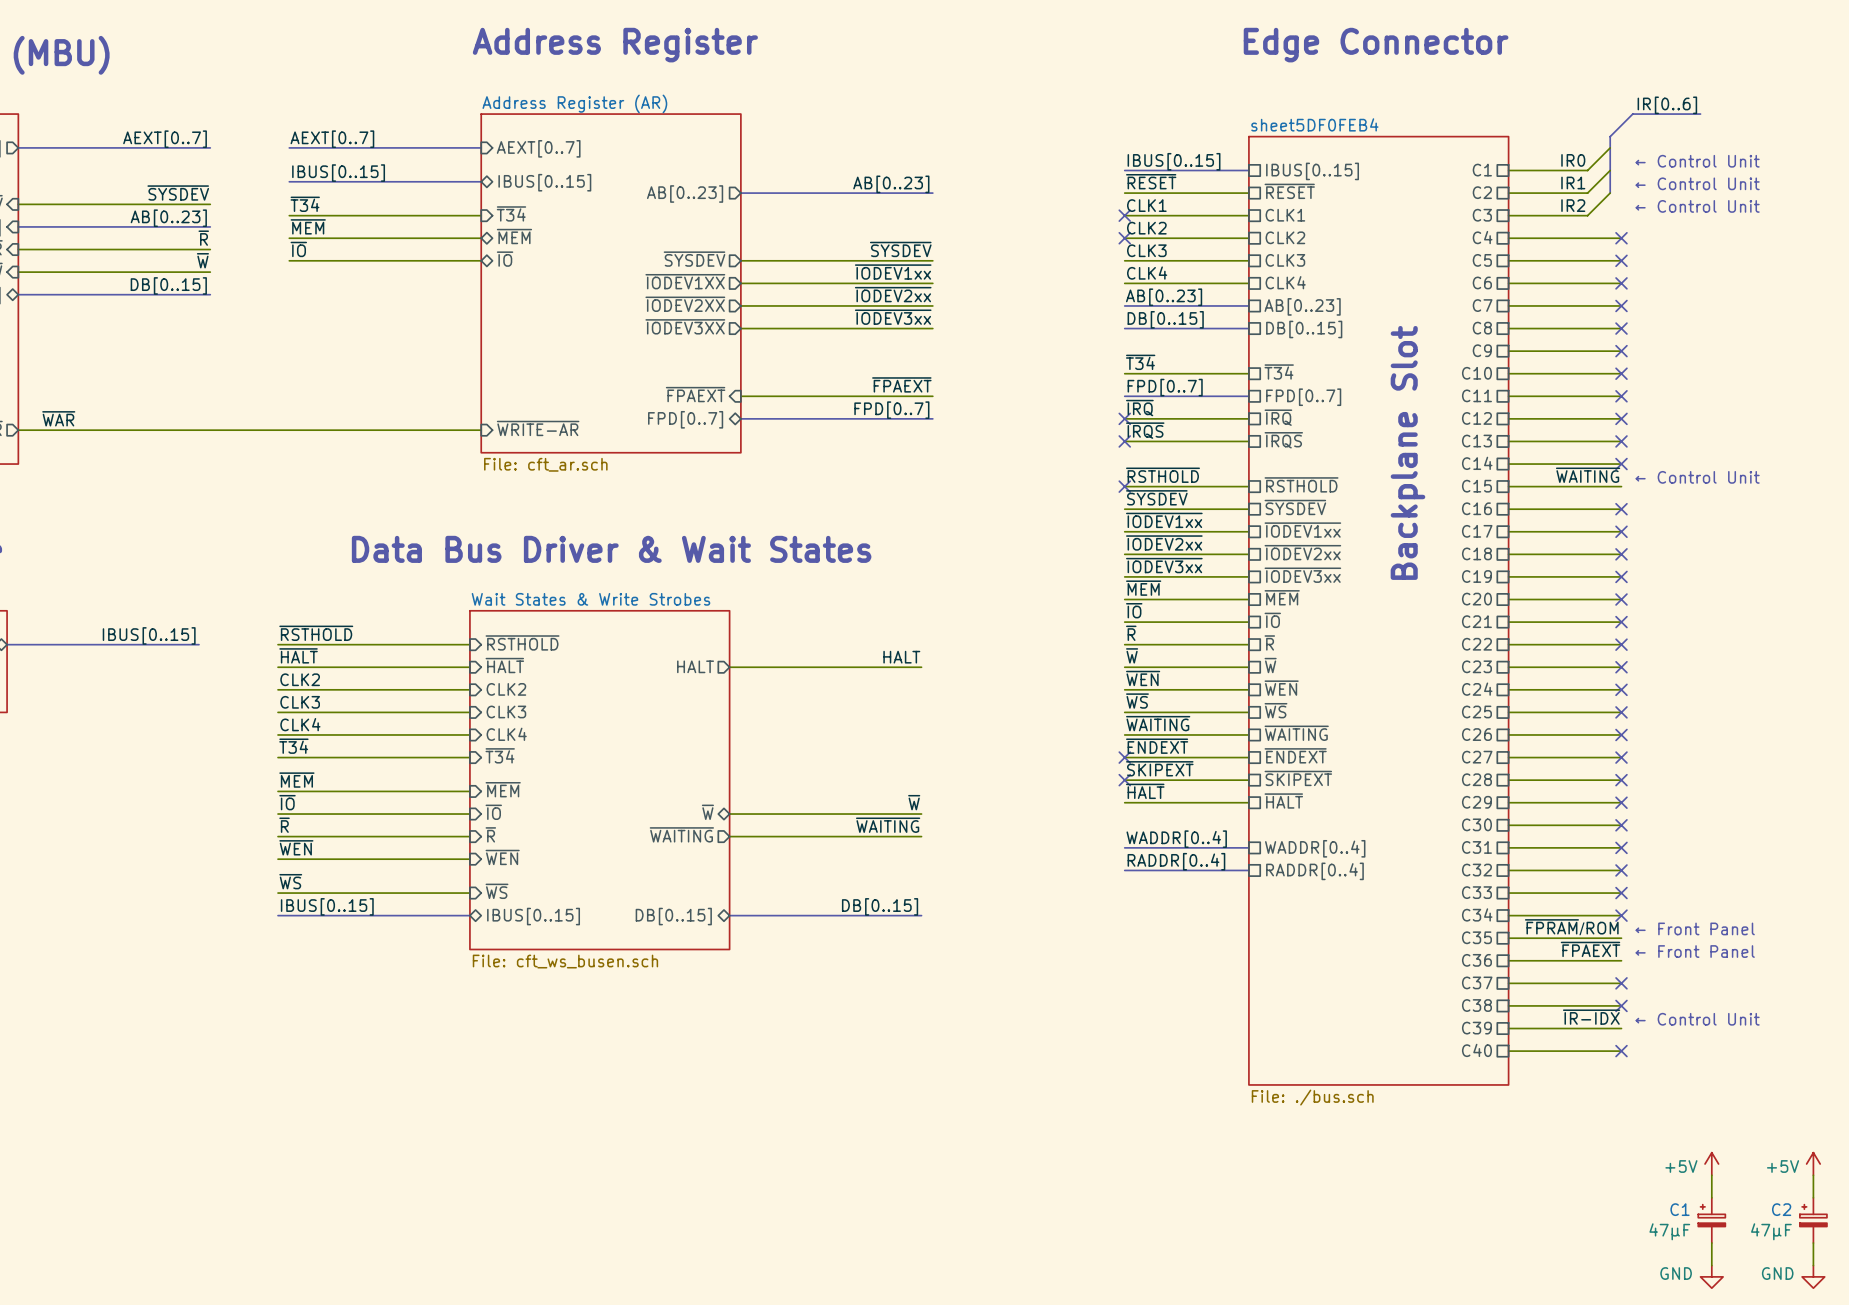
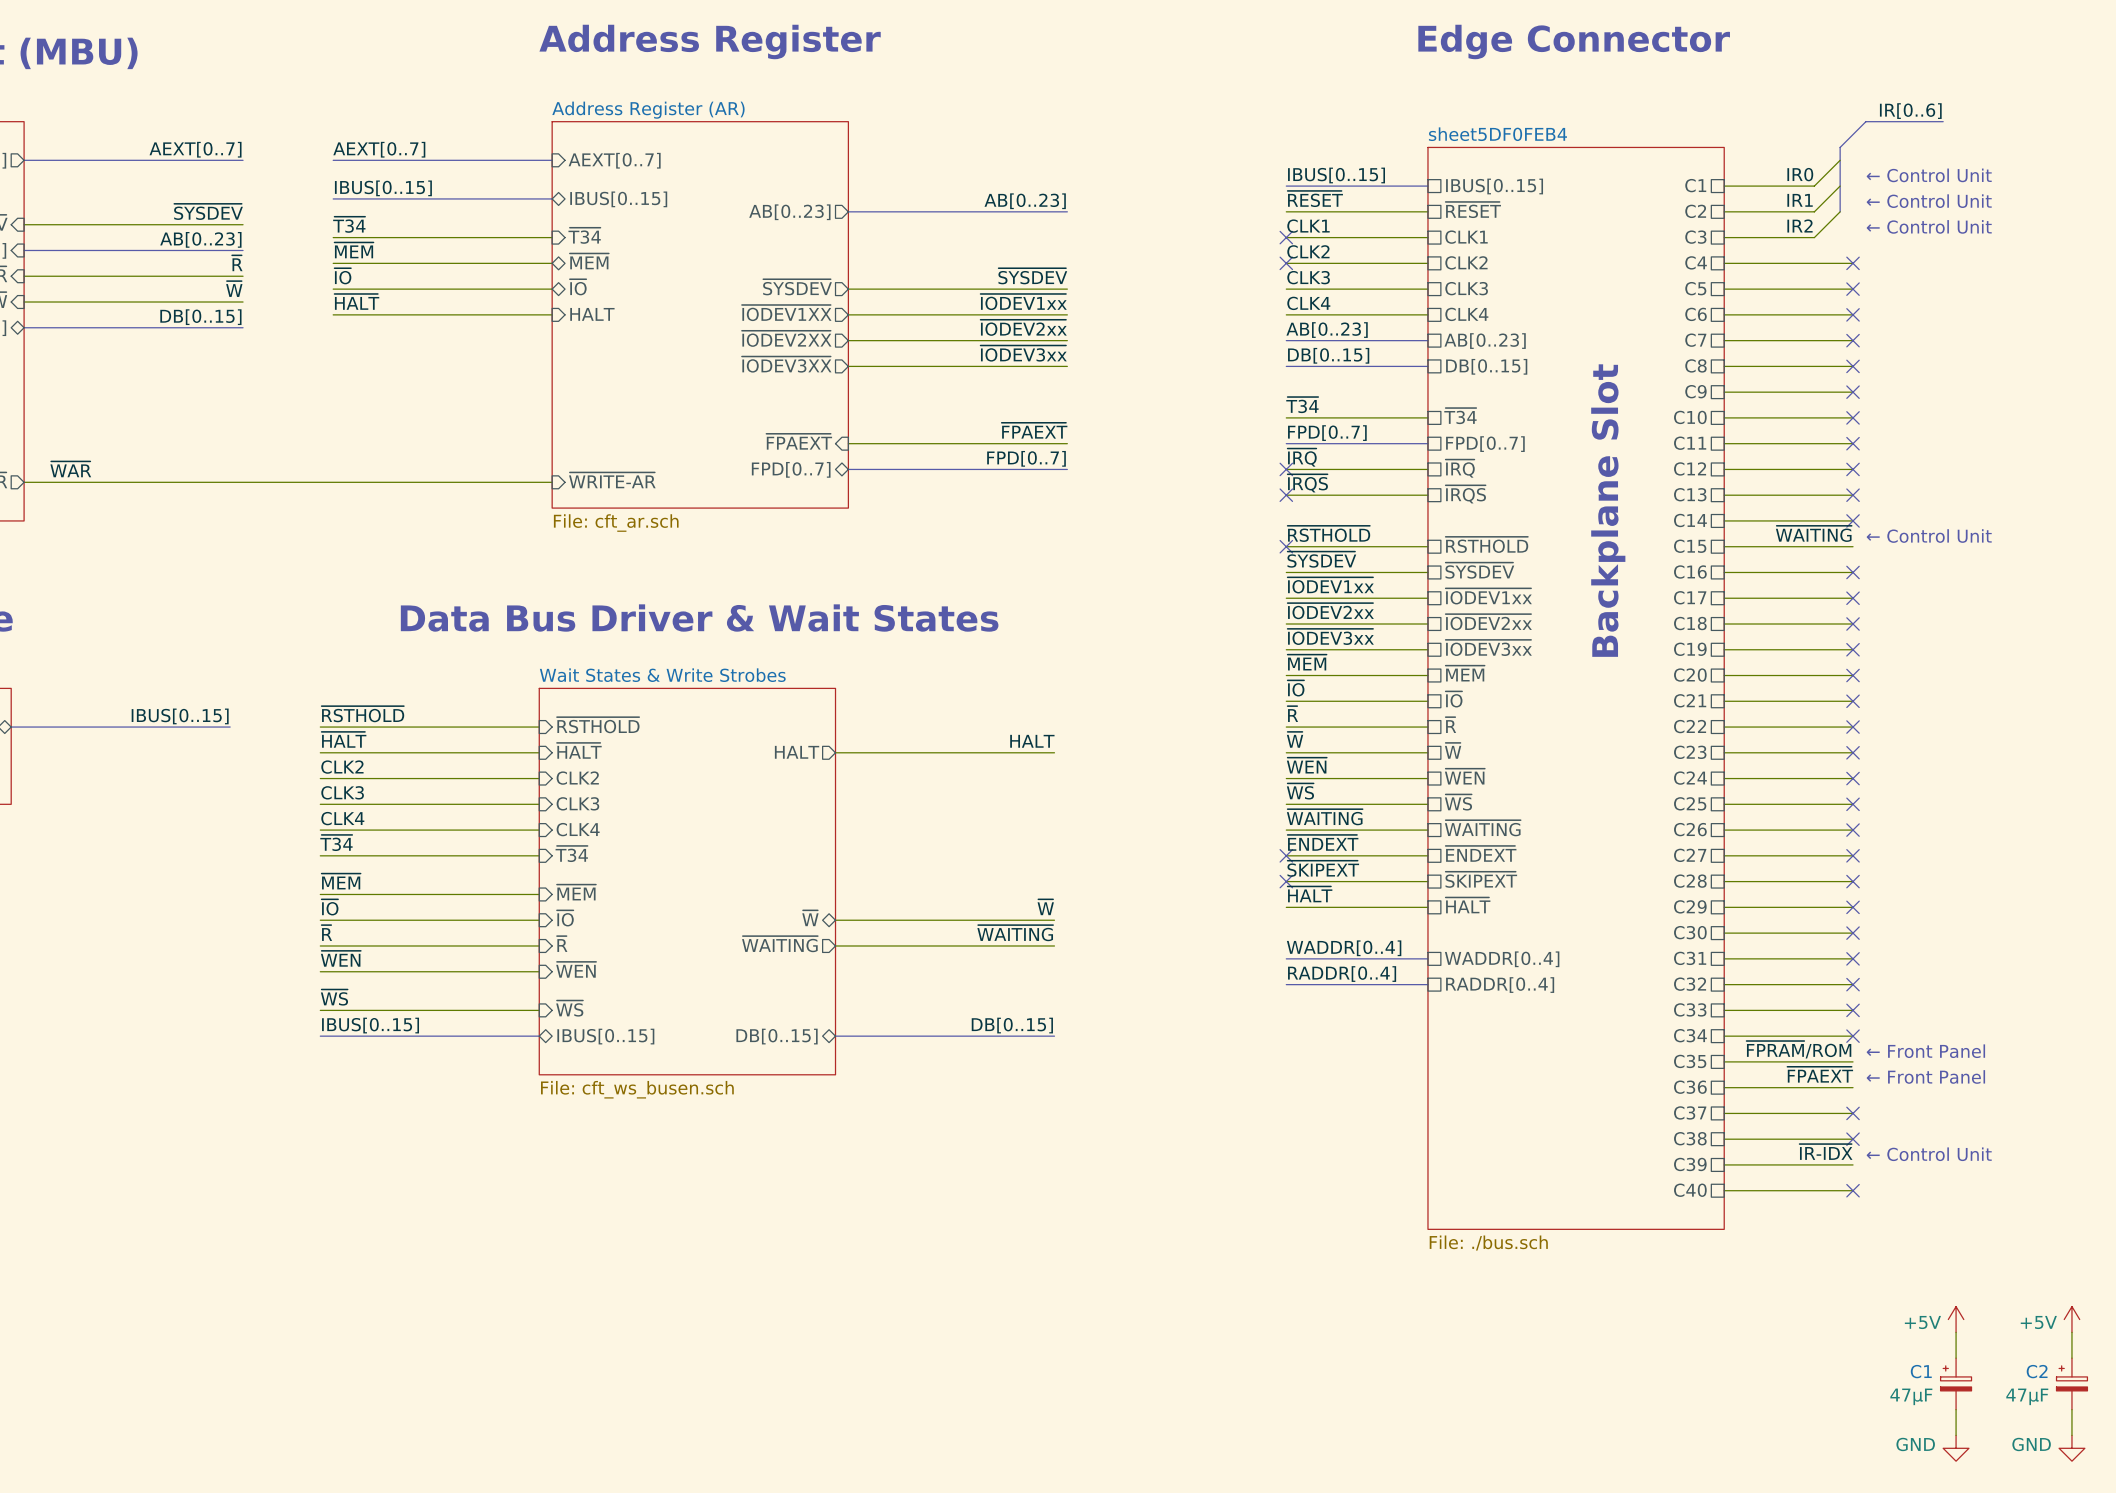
label: none -> ~{HALT} (356, 301)
sheet pin: none -> HALT (592, 314)
wire: none -> (333, 314) (552, 314)

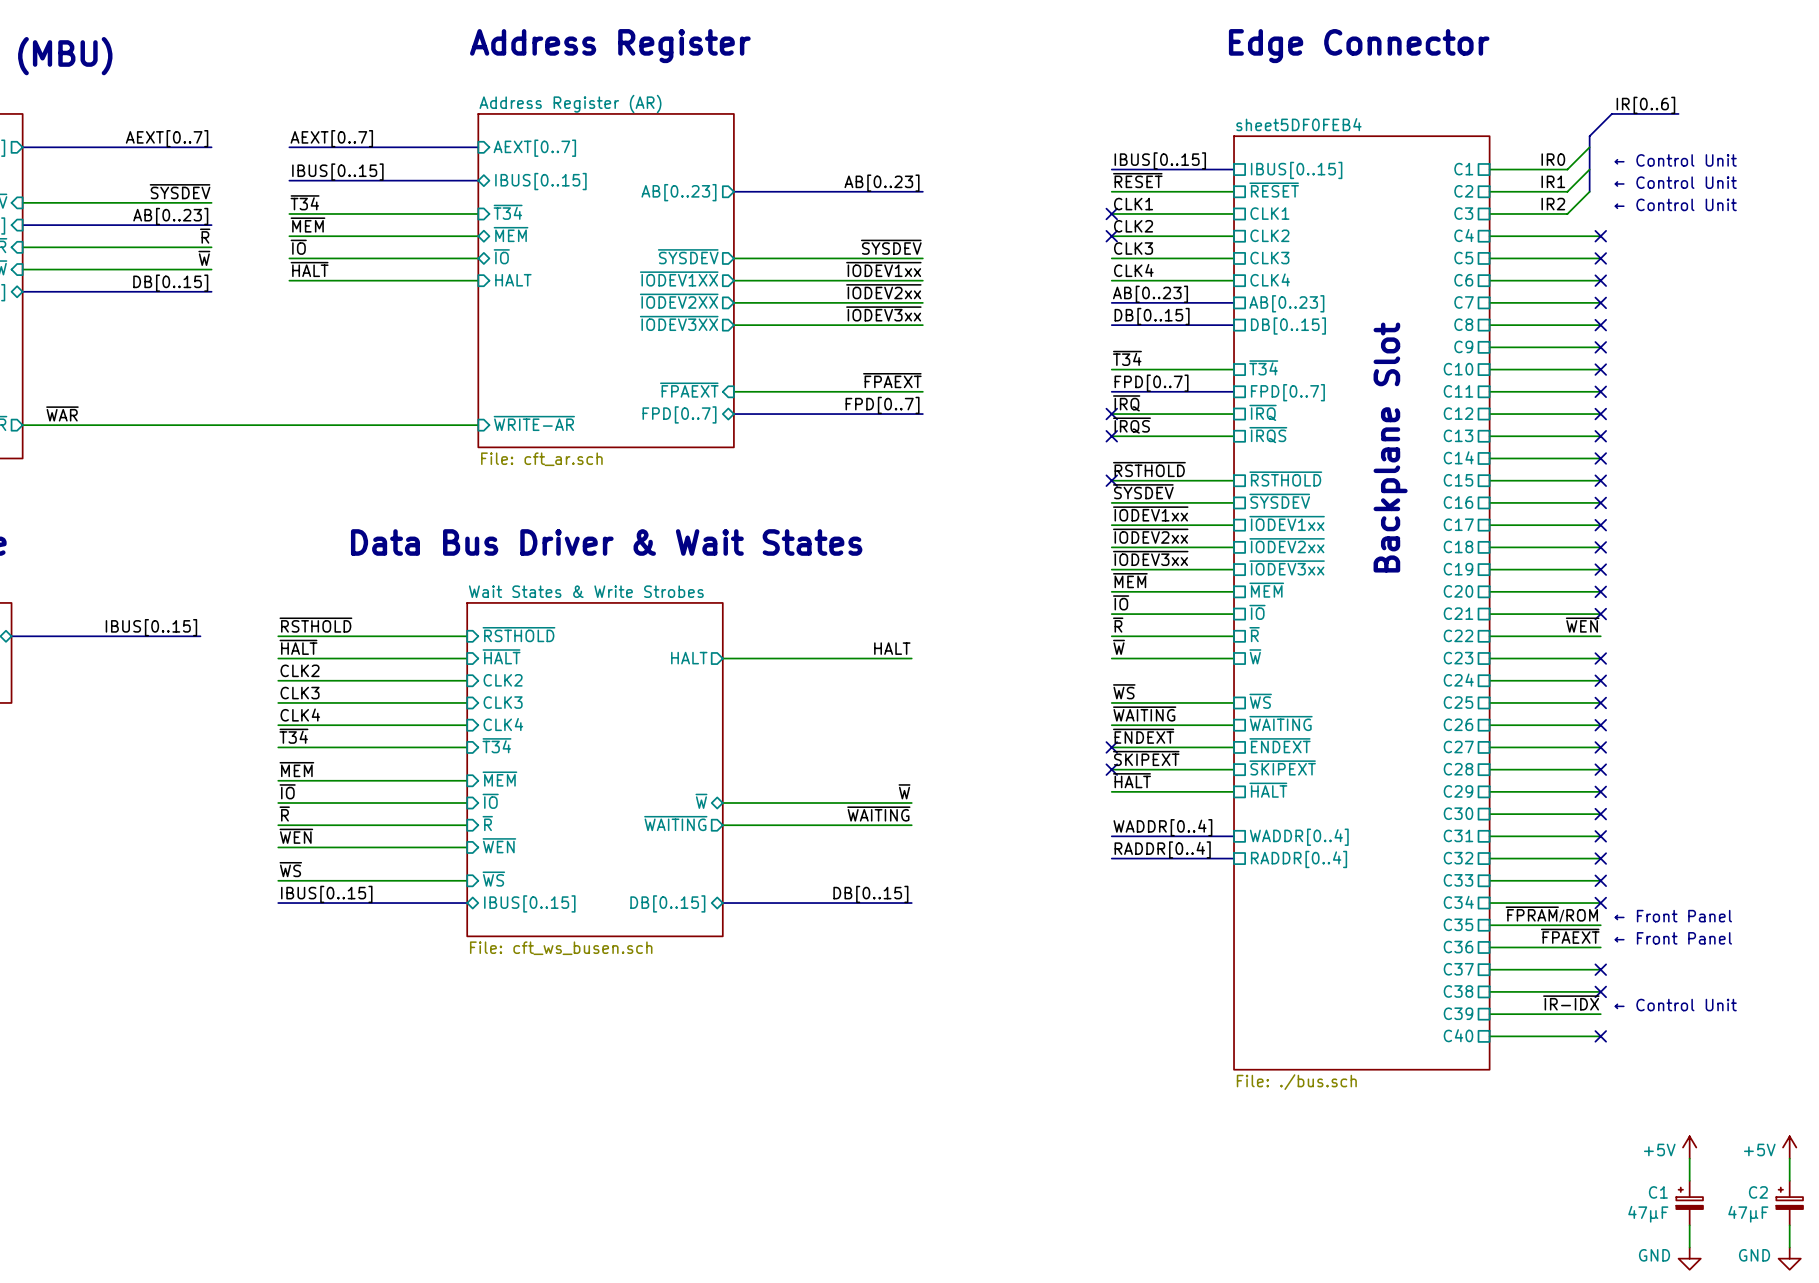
label: ~{WAITING} (1813, 533) -> none
text: ← Control Unit (1929, 536) -> none
no-connect mark: none -> (1600, 480)
label: none -> ~{WEN} (1582, 625)
no-connect mark: (1853, 727) -> none
label: ~{WEN} (1306, 765) -> none
sheet pin: ~{WEN} (1464, 776) -> none
wire: (1286, 778) (1427, 778) -> none

